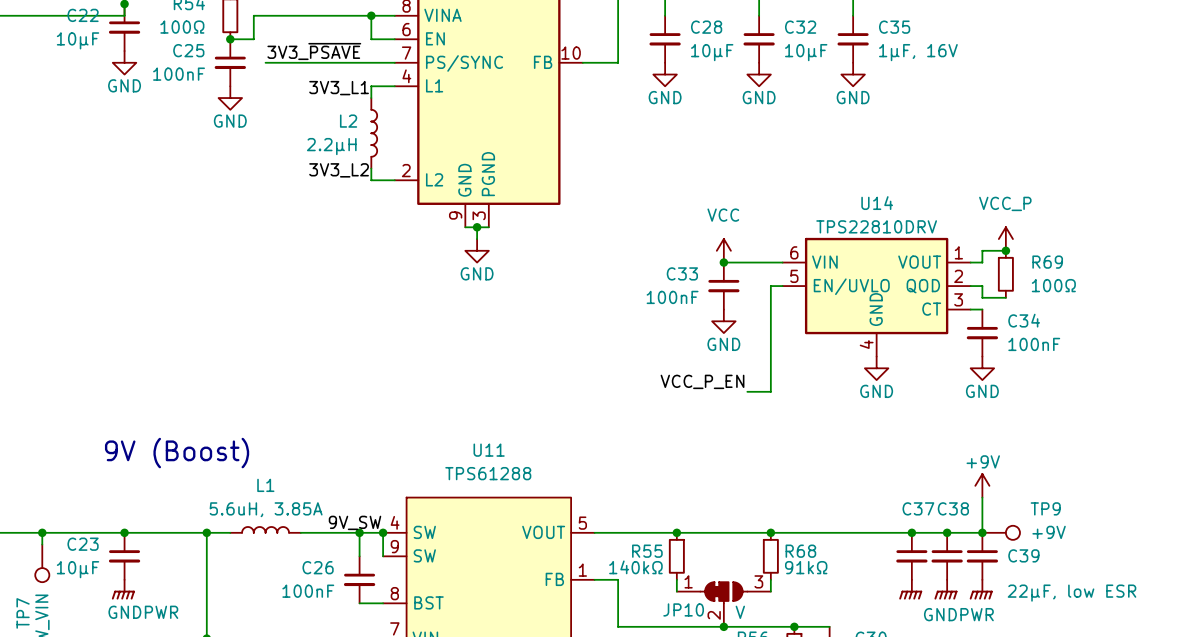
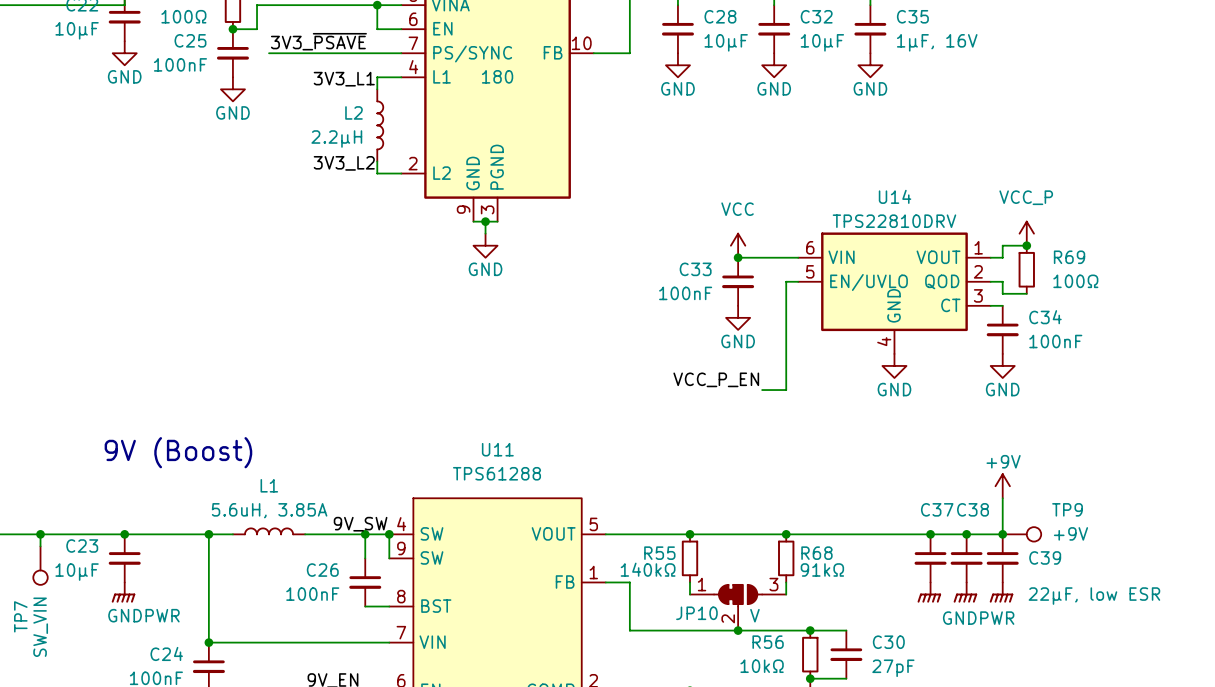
part text: none -> 180 (497, 76)

